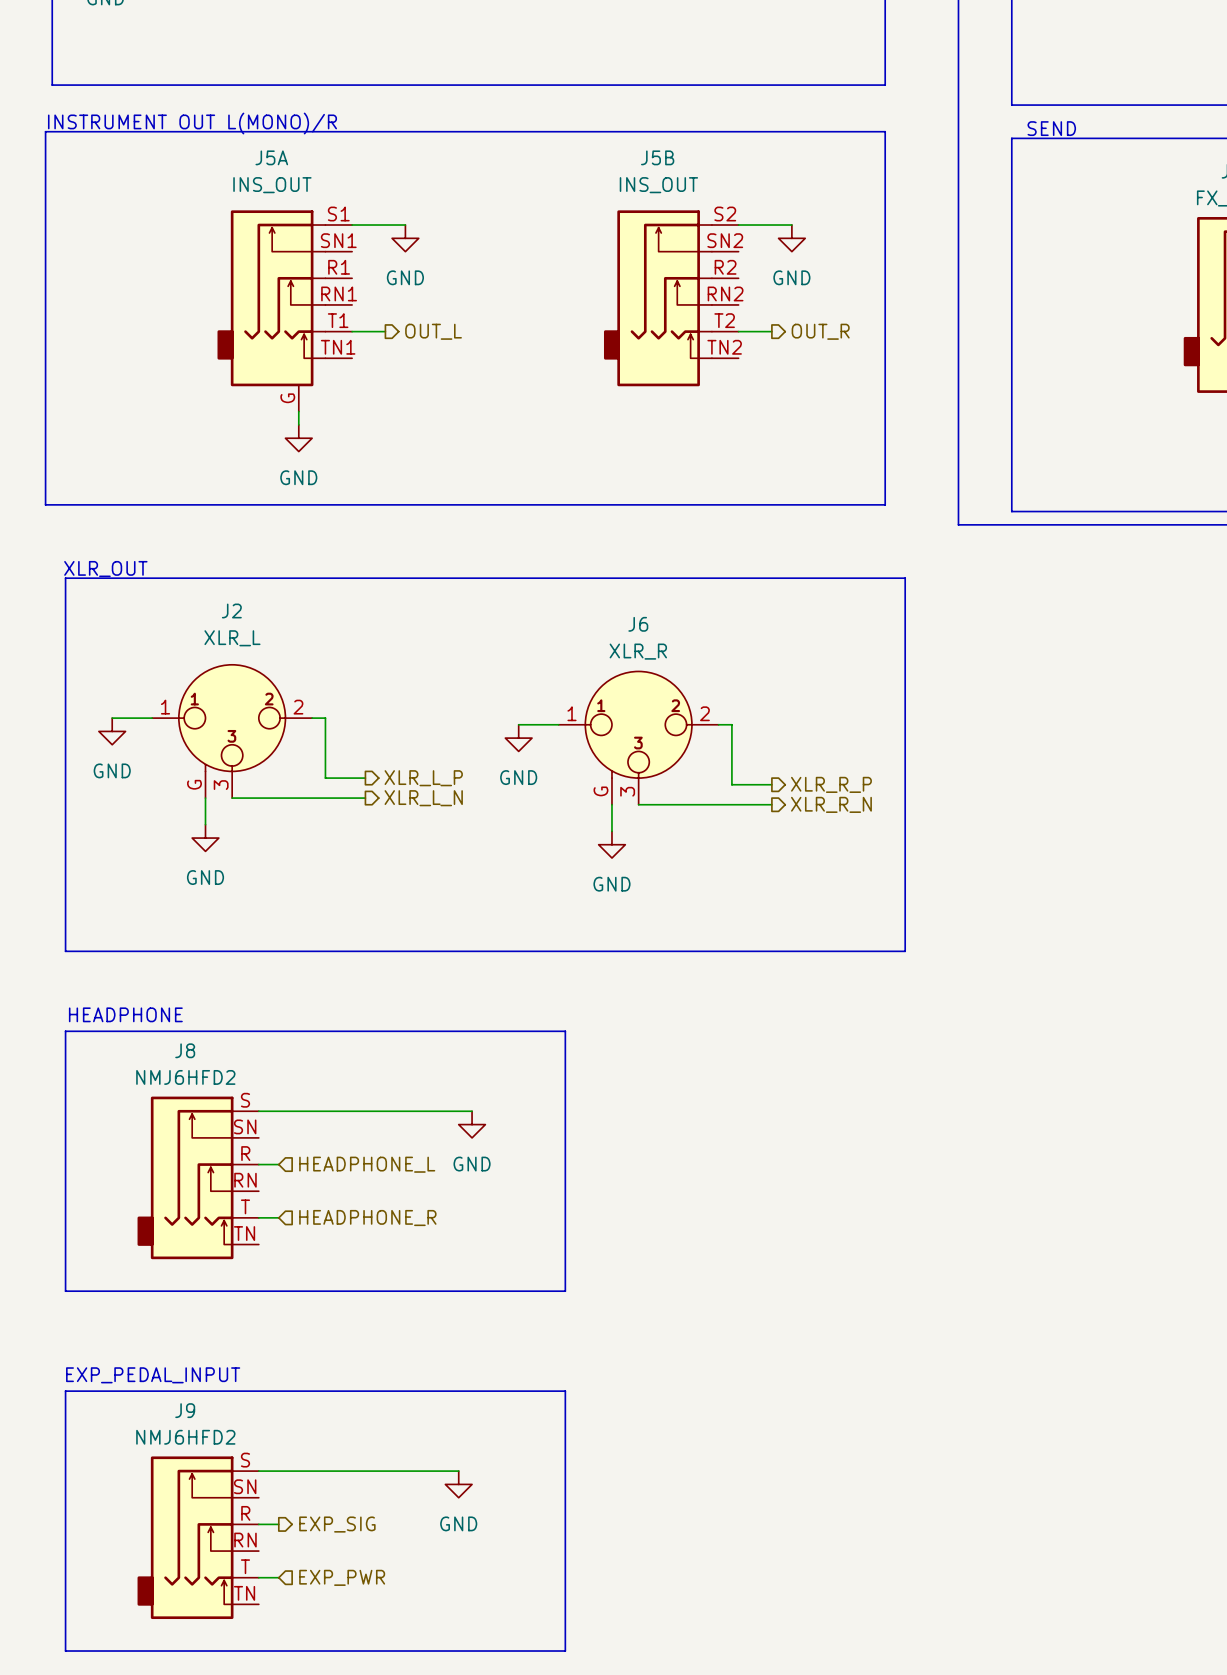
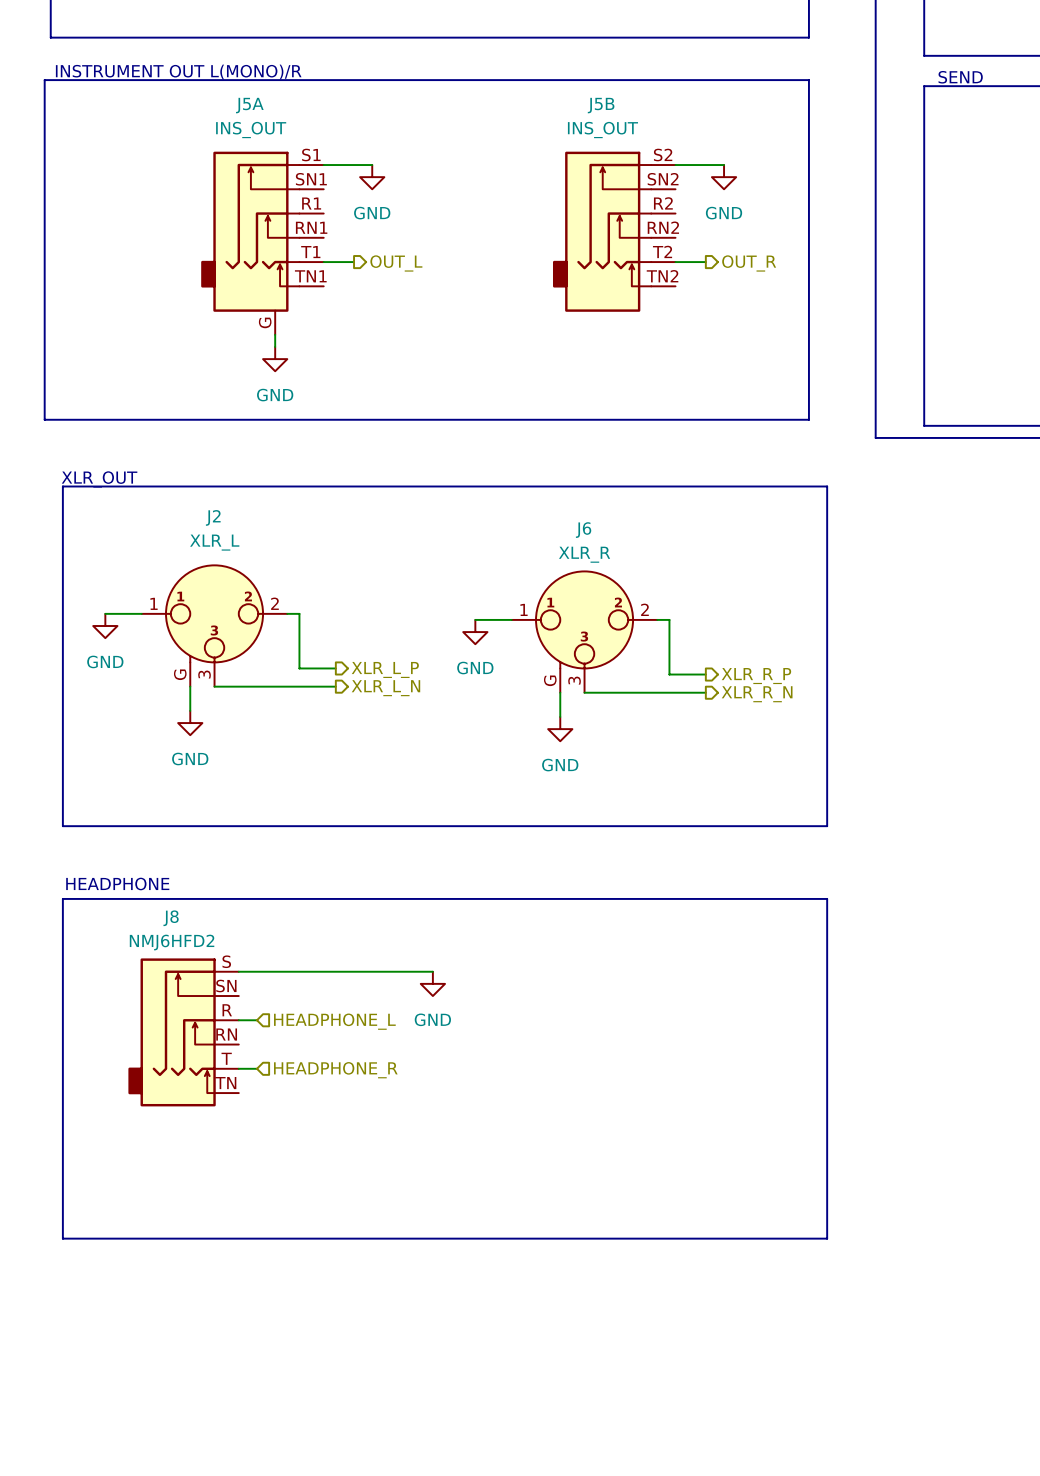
line: (565, 1031) (565, 1291) (65, 1291) -> (517, 898) (827, 898) (827, 1238) (62, 1238)
text: EXP_PEDAL_INPUT (153, 1375) -> none
line: (65, 1391) (565, 1391) (565, 1651) (65, 1651) (65, 1404) -> (62, 1226) (62, 1135)
wire: (258, 1471) (458, 1471) -> none
power symbol: GND (458, 1484) -> none
wire: (258, 1524) (278, 1524) -> none
hierarchical label: EXP_SIG (337, 1524) -> none
J9: NMJ6HFD2 (198, 1537) -> none
wire: (258, 1577) (278, 1577) -> none
hierarchical label: EXP_PWR (342, 1577) -> none

